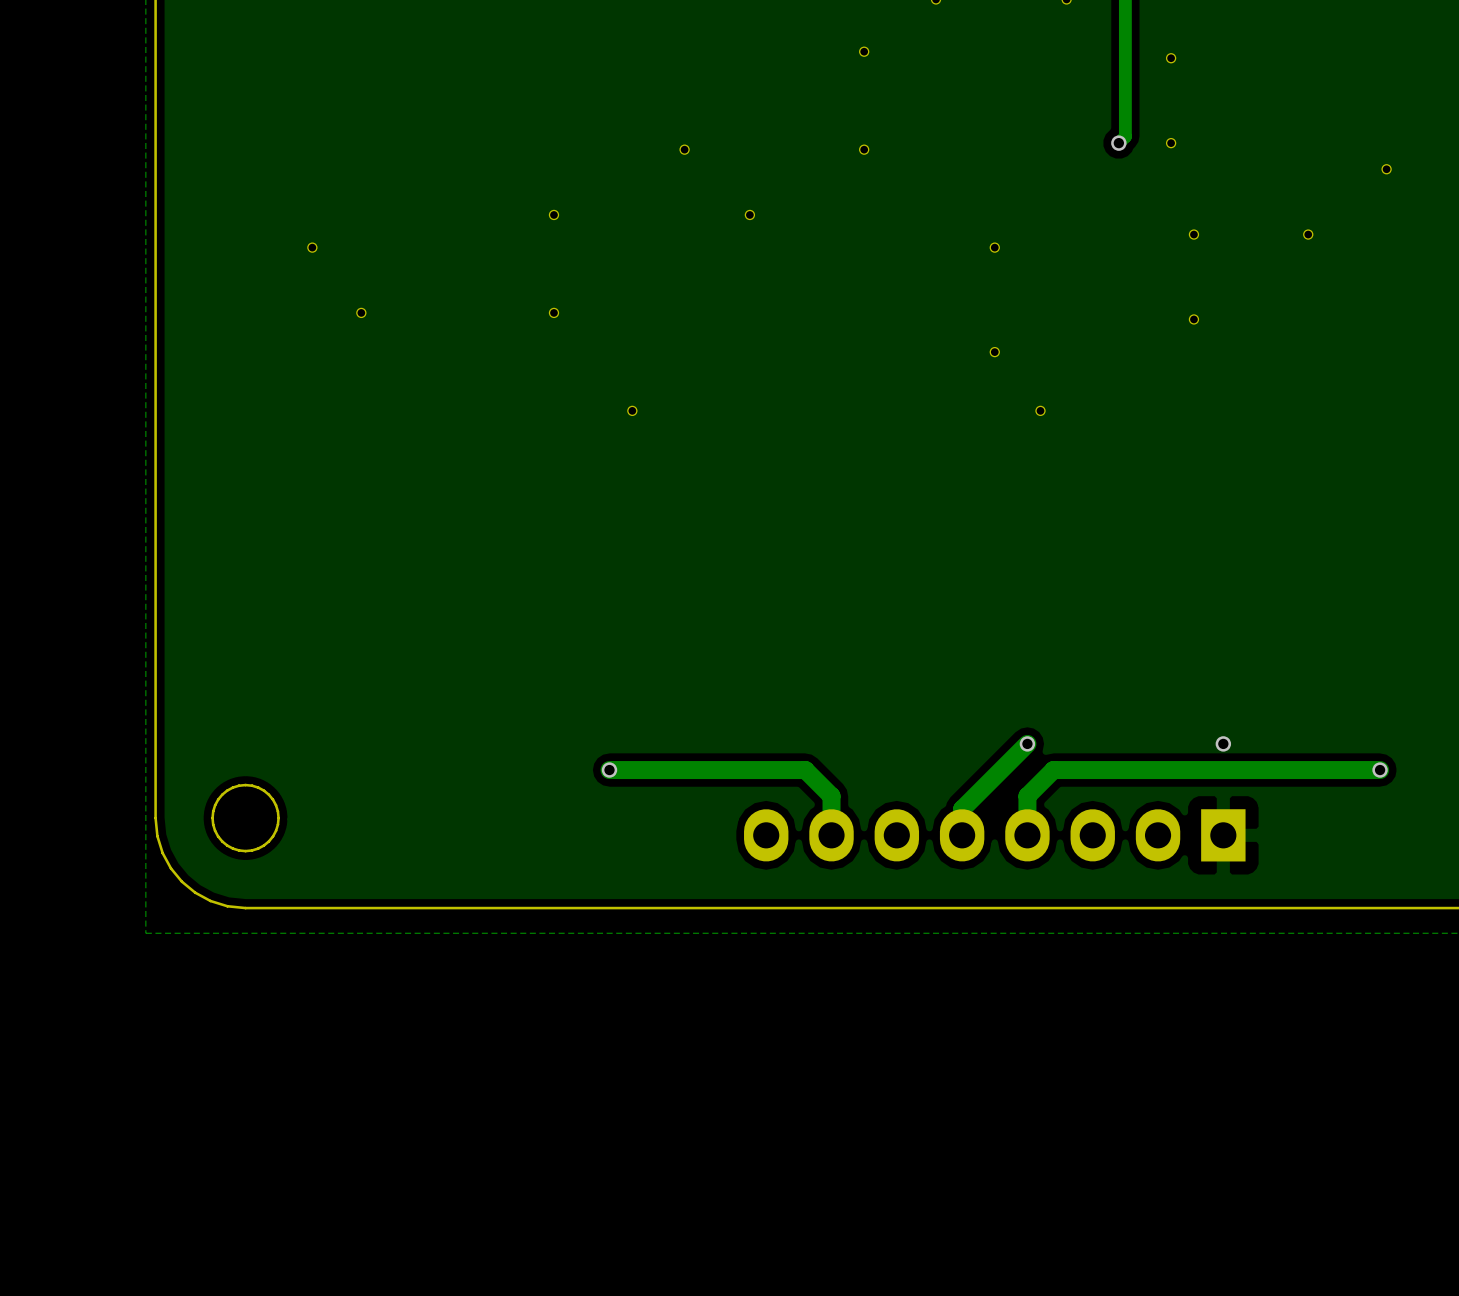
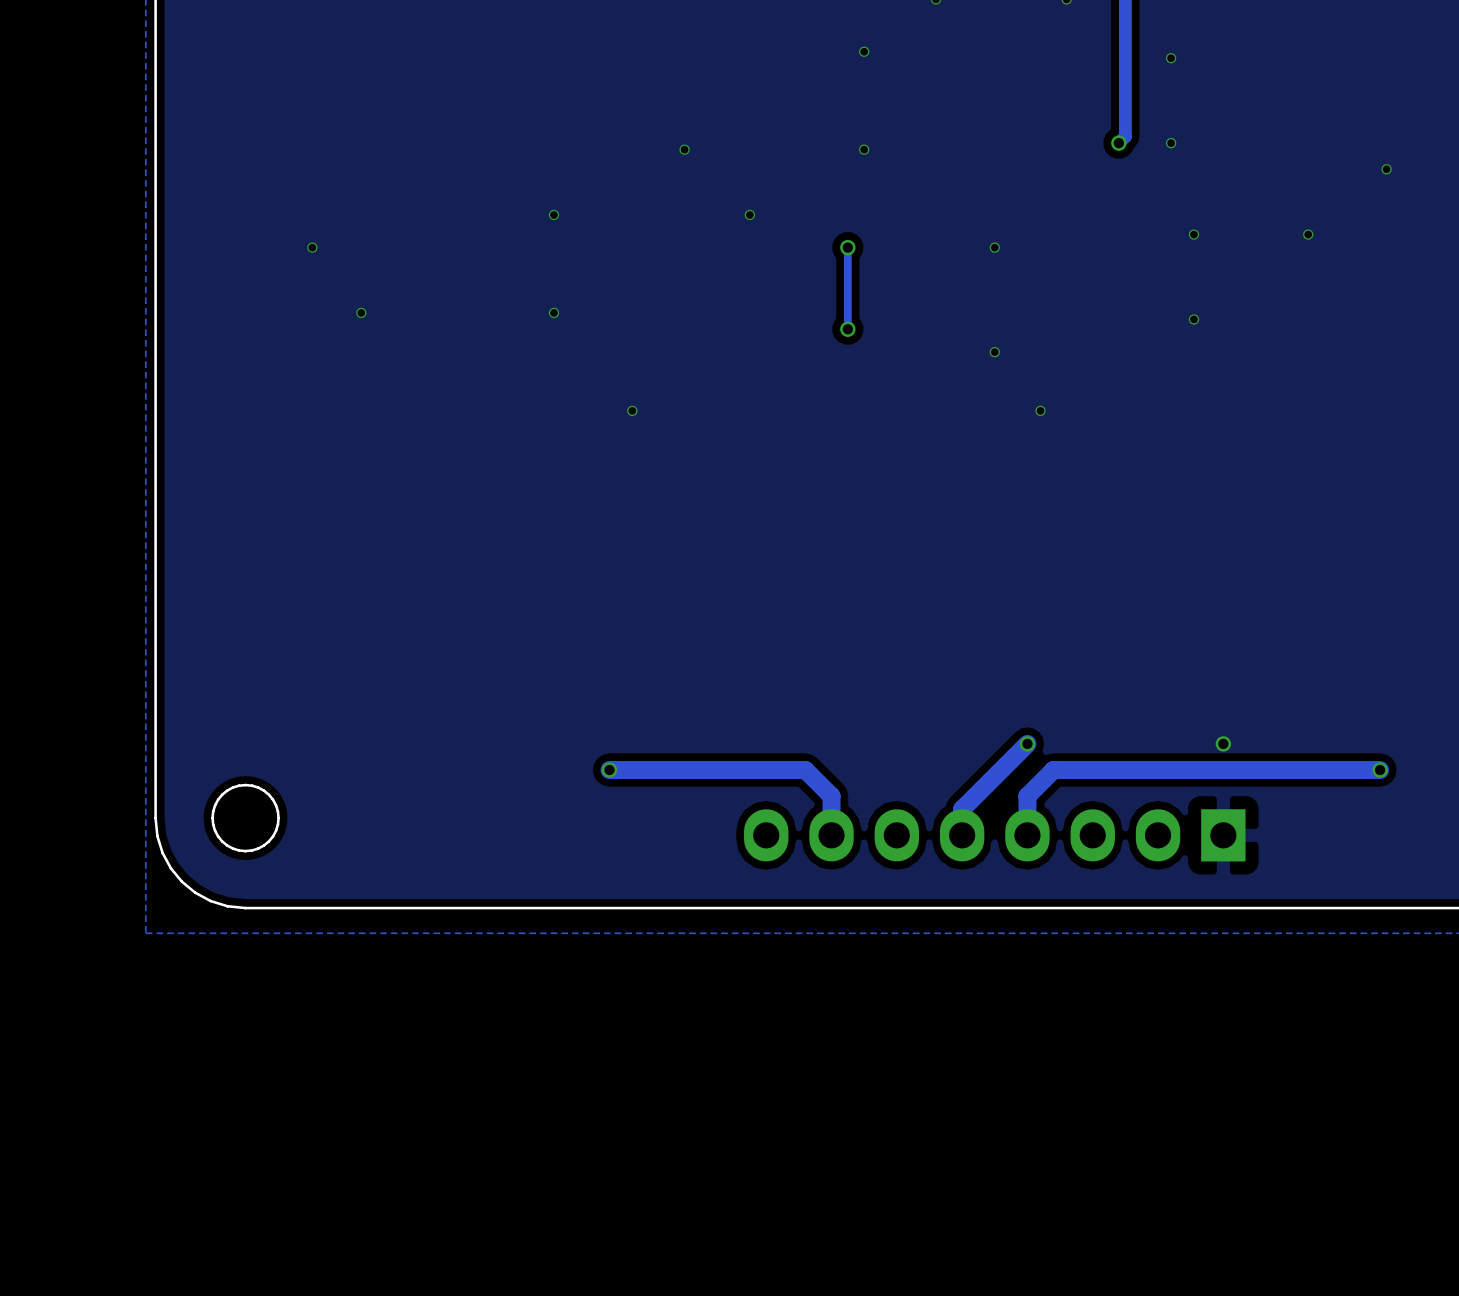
track: none -> (847, 247) (847, 329)
via: none -> (847, 247)
via: none -> (847, 329)

